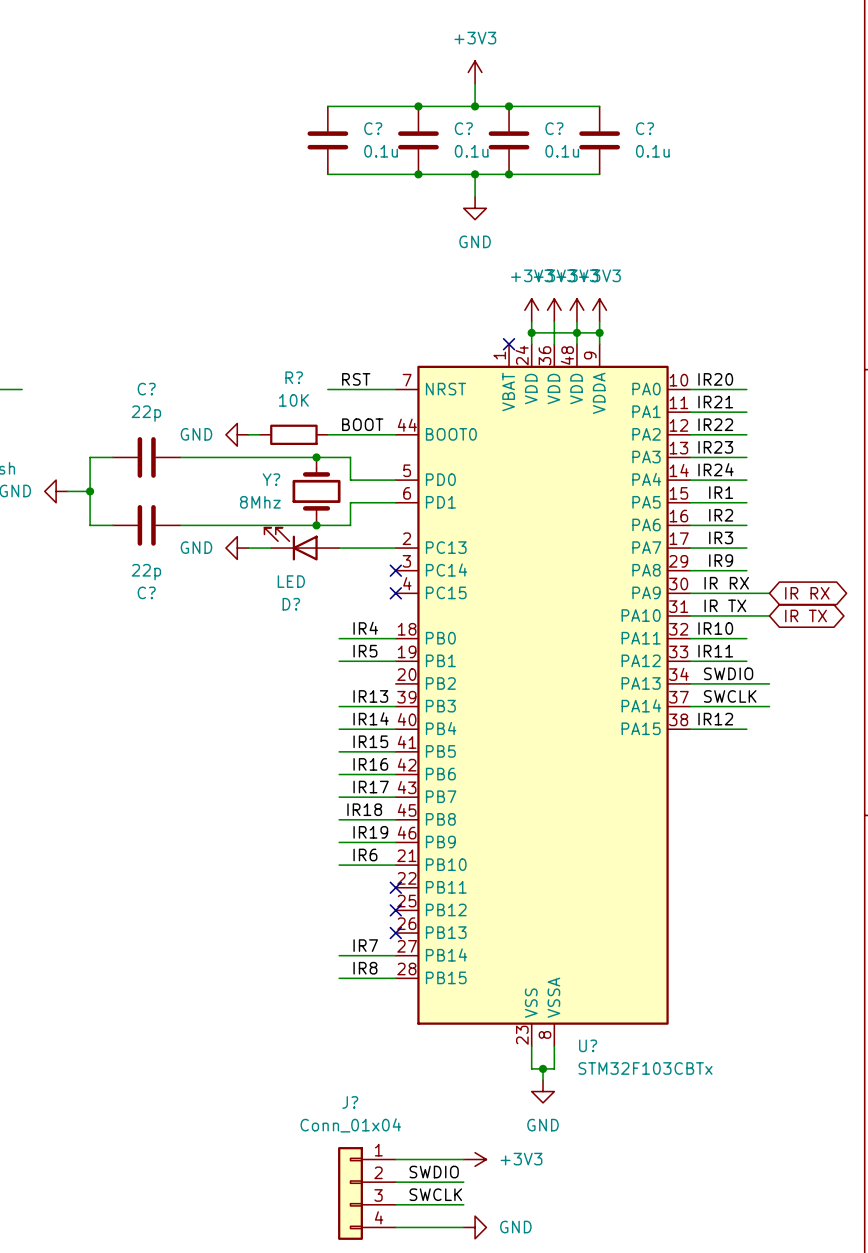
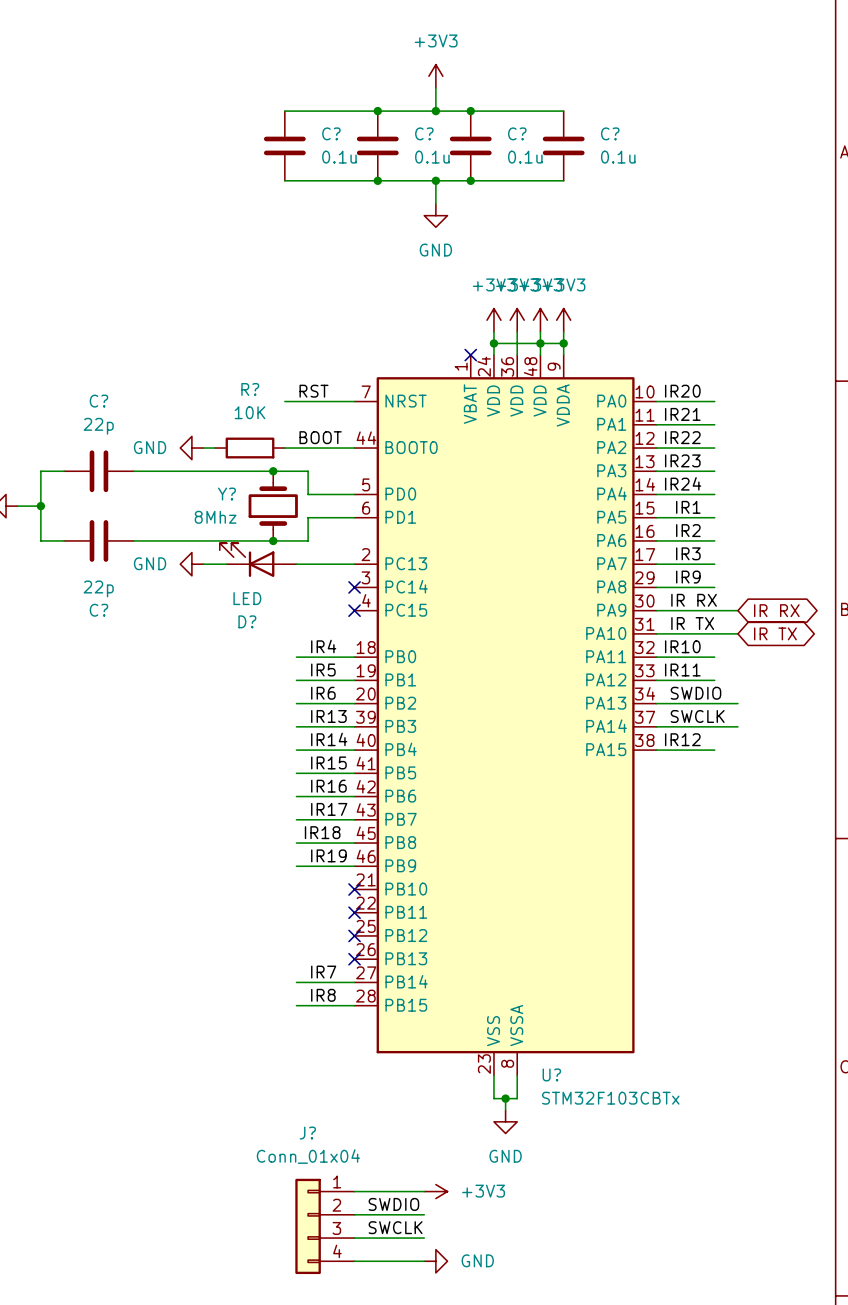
label position: IR6 (365, 854) -> IR6 (323, 693)
wire: (339, 865) (395, 865) -> (296, 703) (354, 703)
no-connect mark: none -> (354, 889)

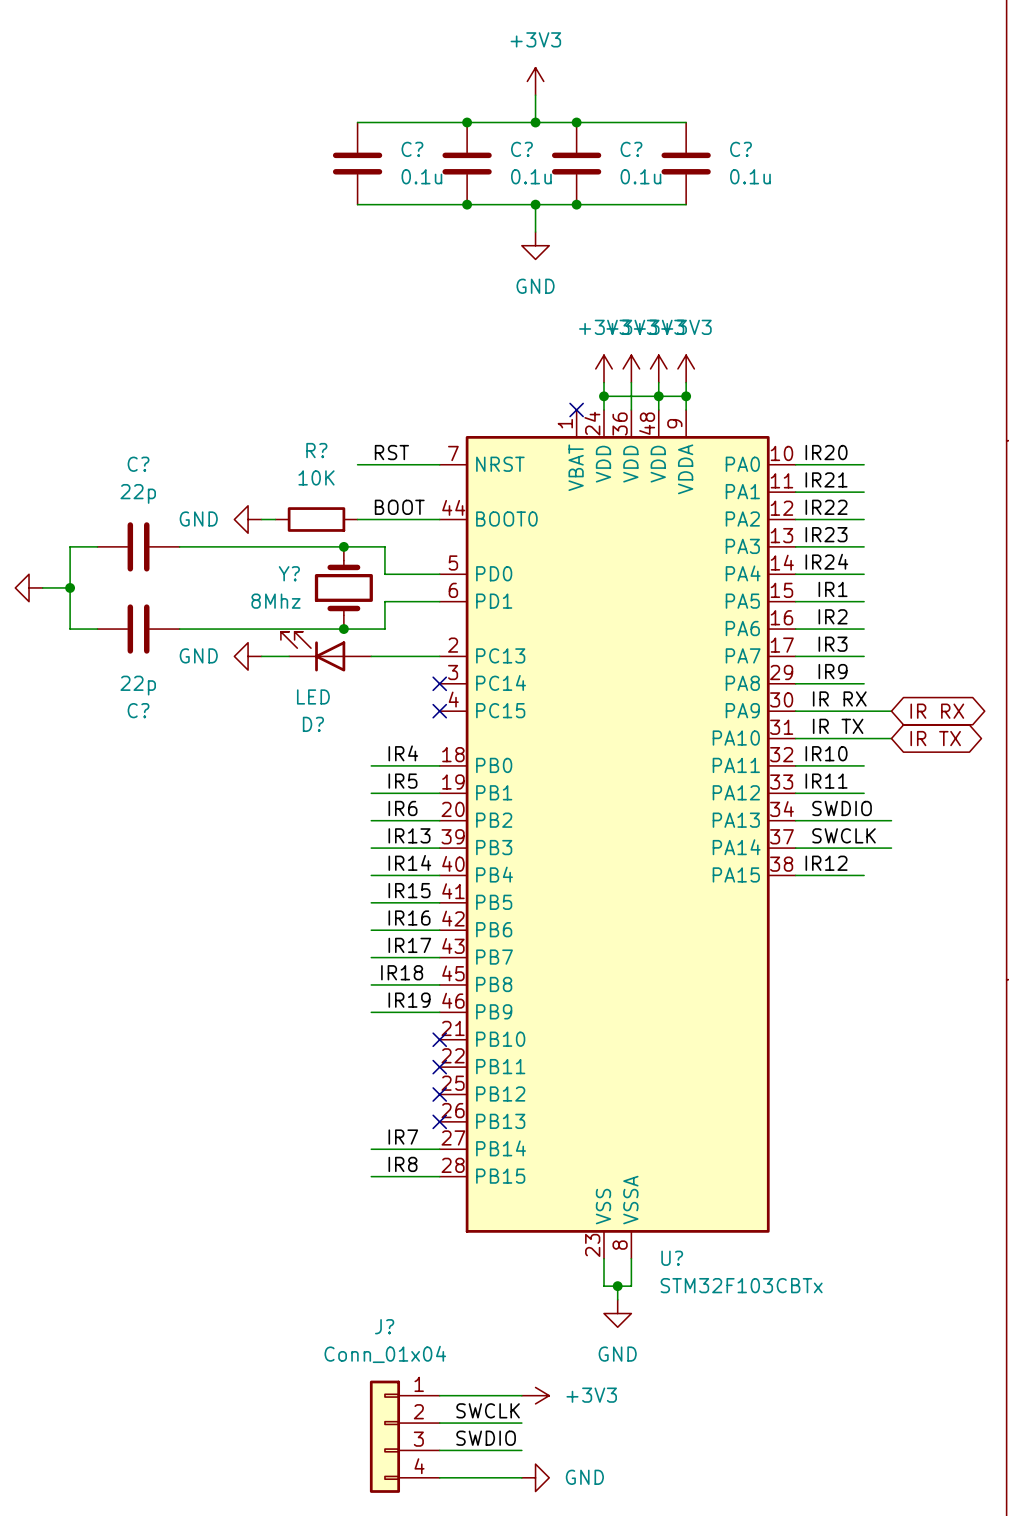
label: SWDIO (393, 1204) -> SWCLK (488, 1410)
label: SWCLK (395, 1227) -> SWDIO (486, 1438)

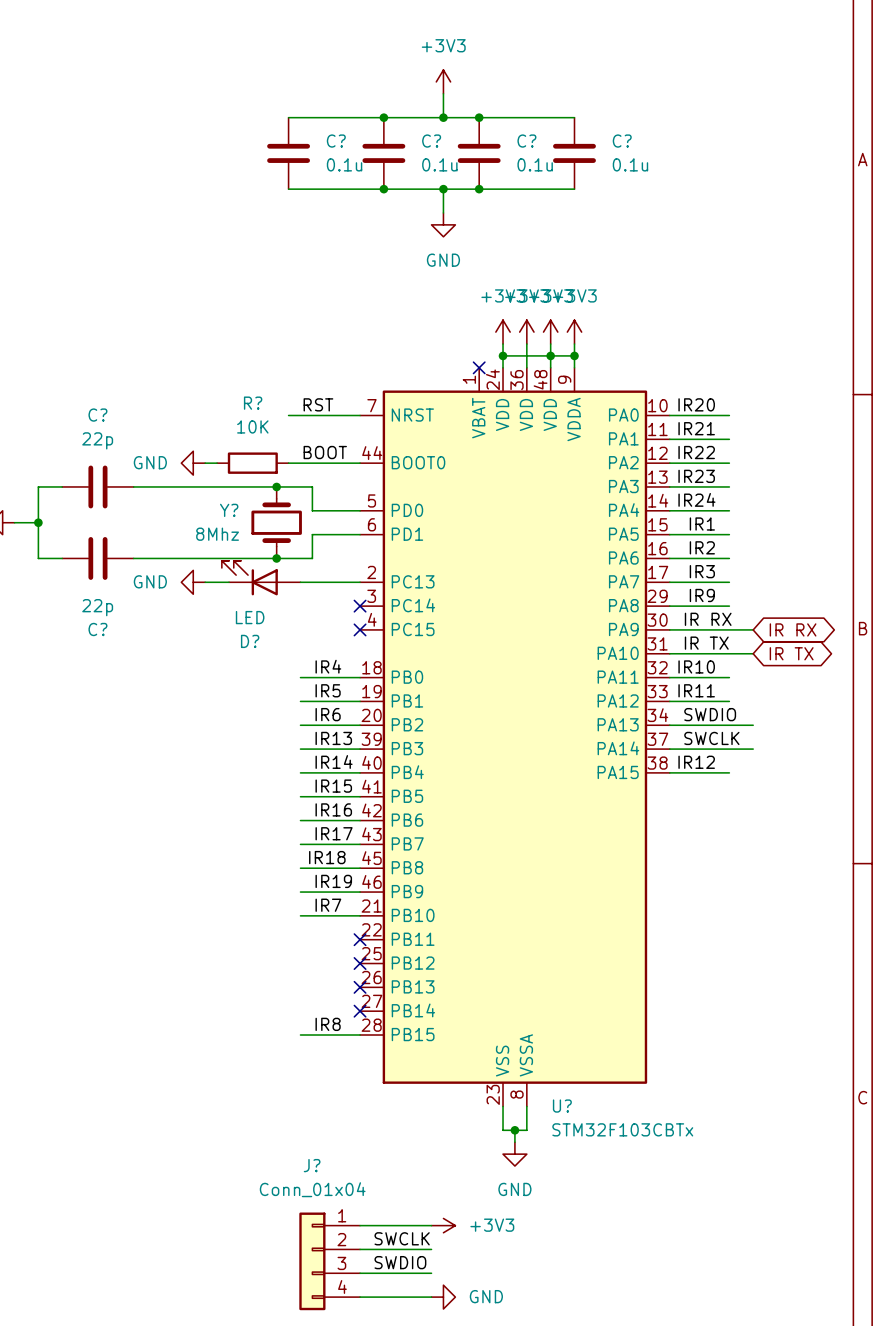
no-connect mark: (439, 1039) -> none
label position: IR7 (403, 1137) -> IR7 (328, 905)
wire: (371, 1149) (439, 1149) -> (300, 915) (360, 915)
no-connect mark: none -> (360, 1011)

